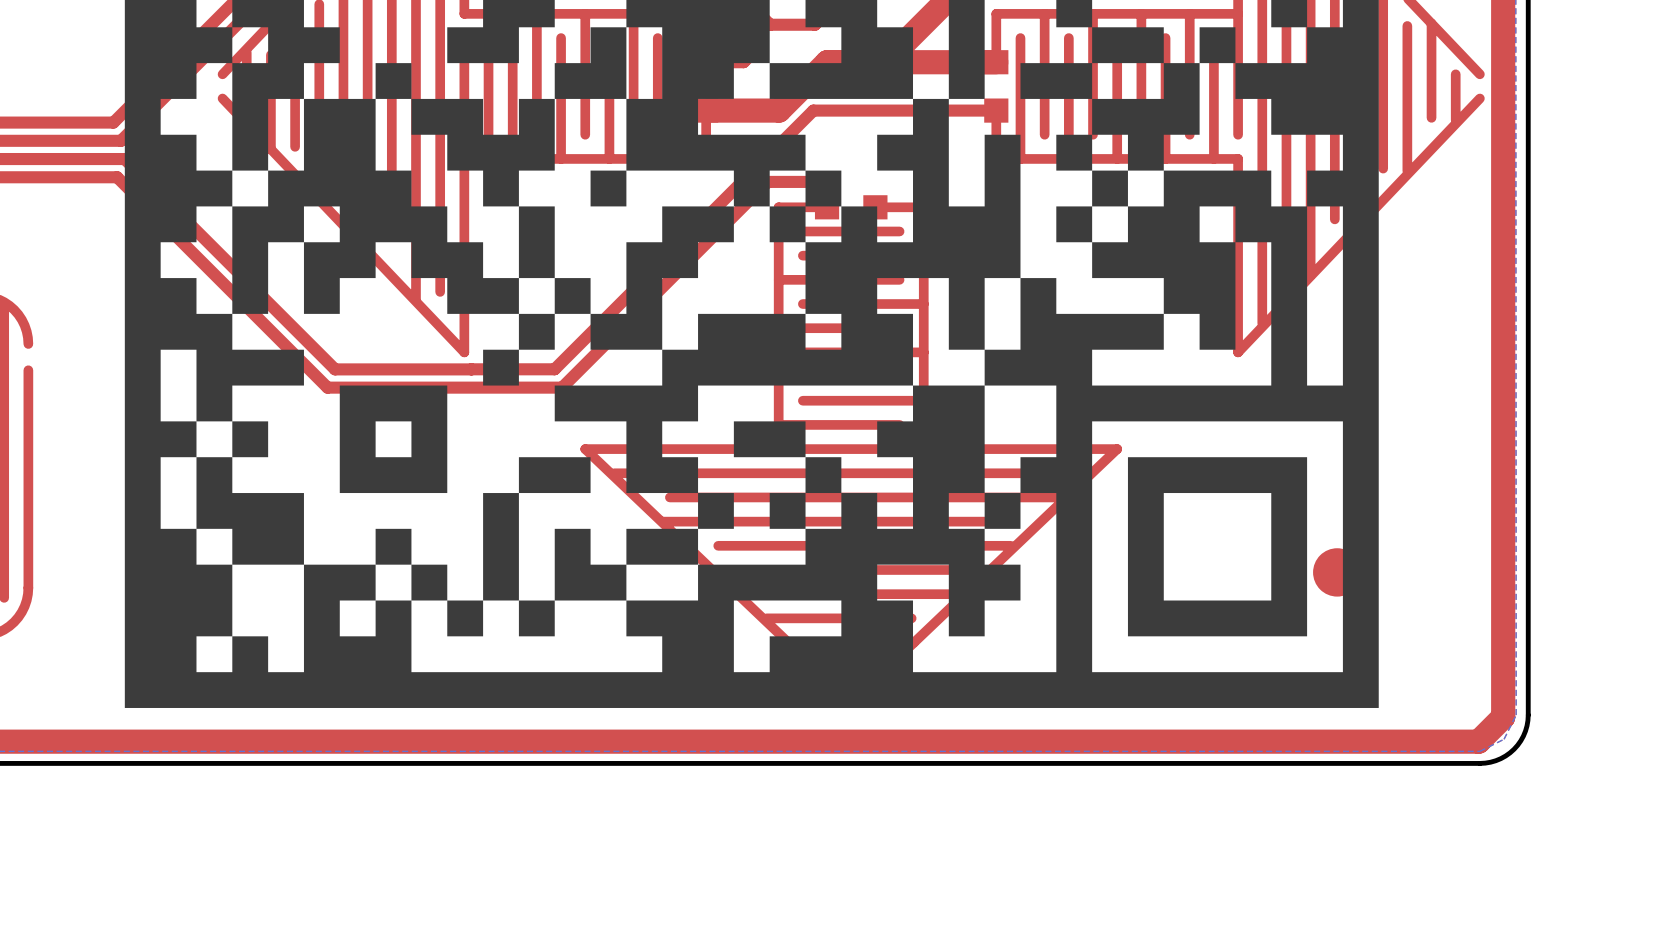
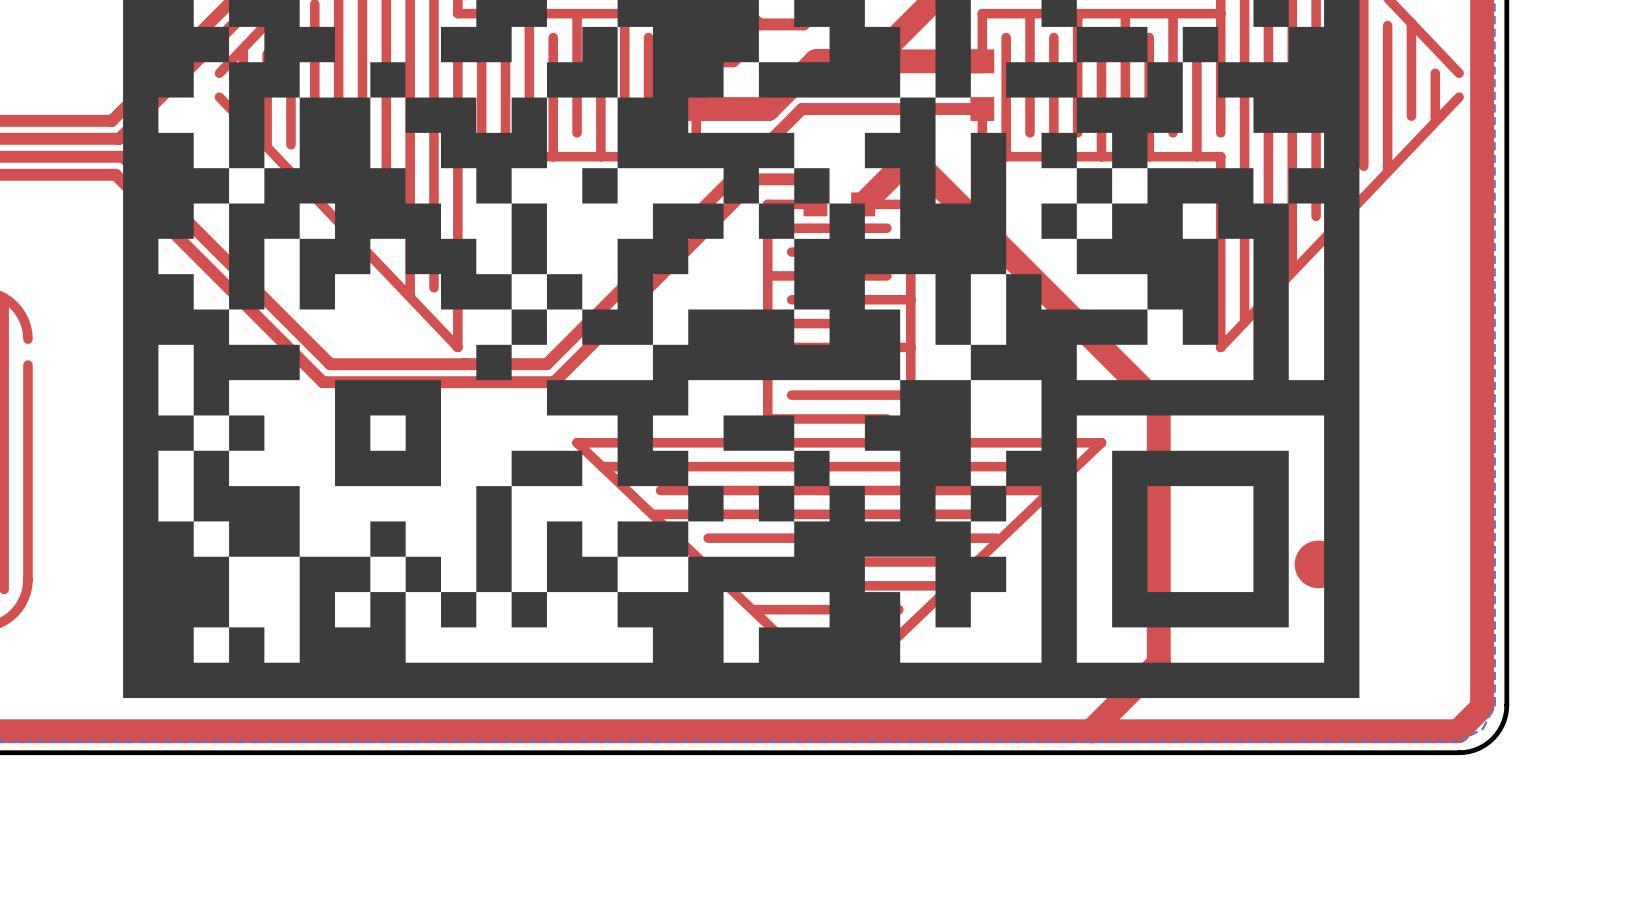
top track: none -> (863, 204) (898, 168) (917, 168) (920, 166) (1158, 404) (1158, 663) (1090, 731)

